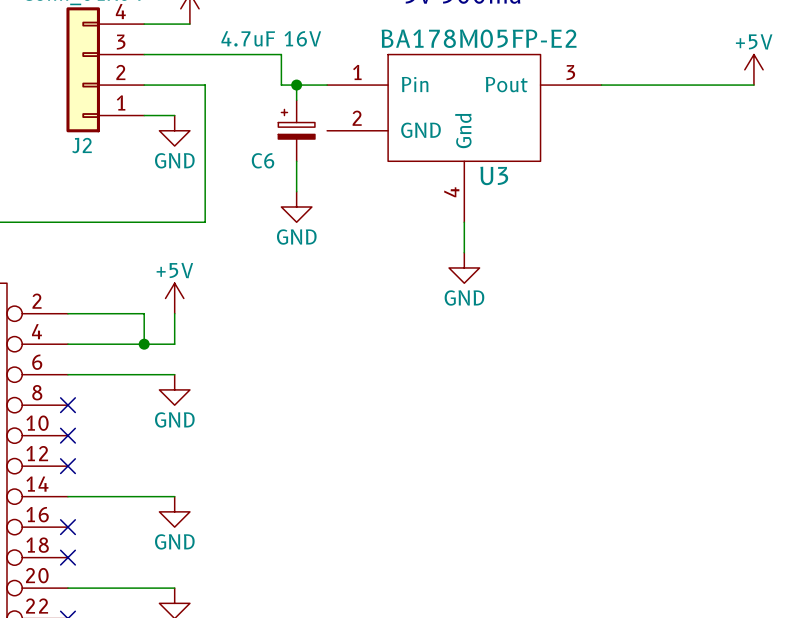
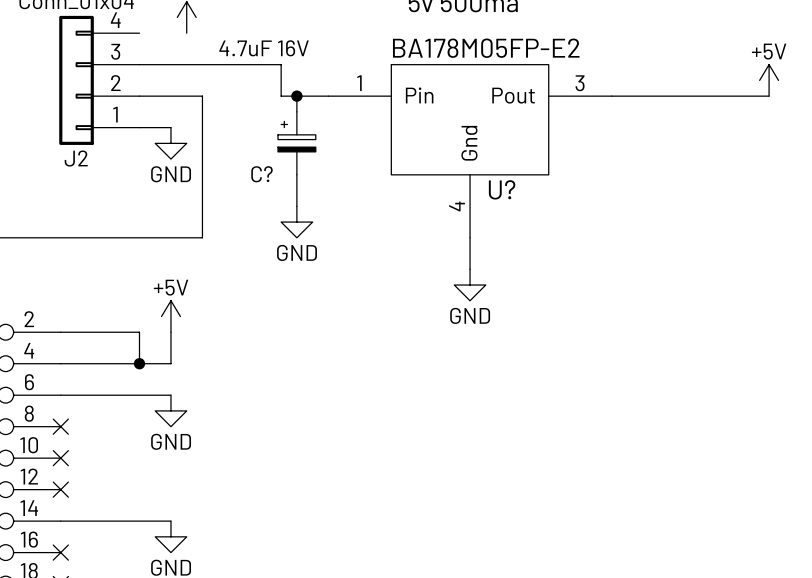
wire: (144, 24) (189, 24) -> none
U3: BA178M05FP-E2 (464, 138) -> none
U?: none -> BA178M05FP-E2 (470, 151)
C6 name: C6 (263, 160) -> C? (262, 174)

